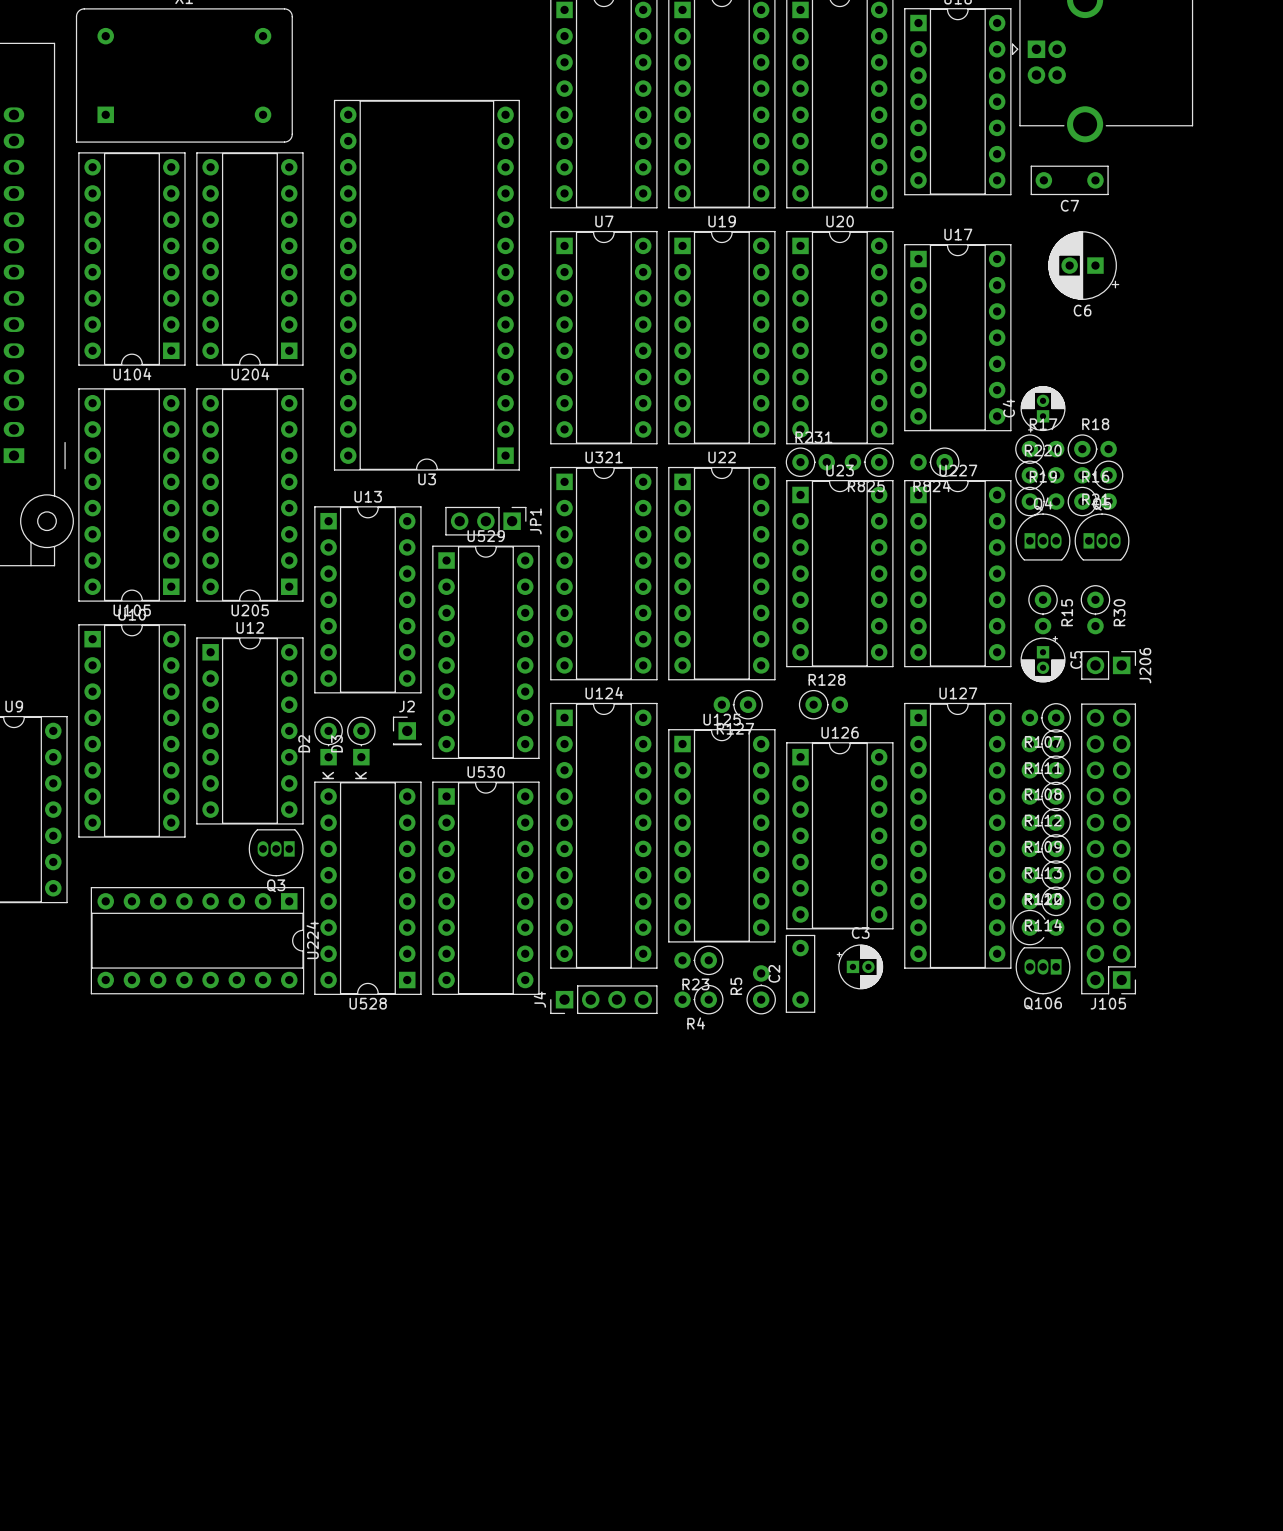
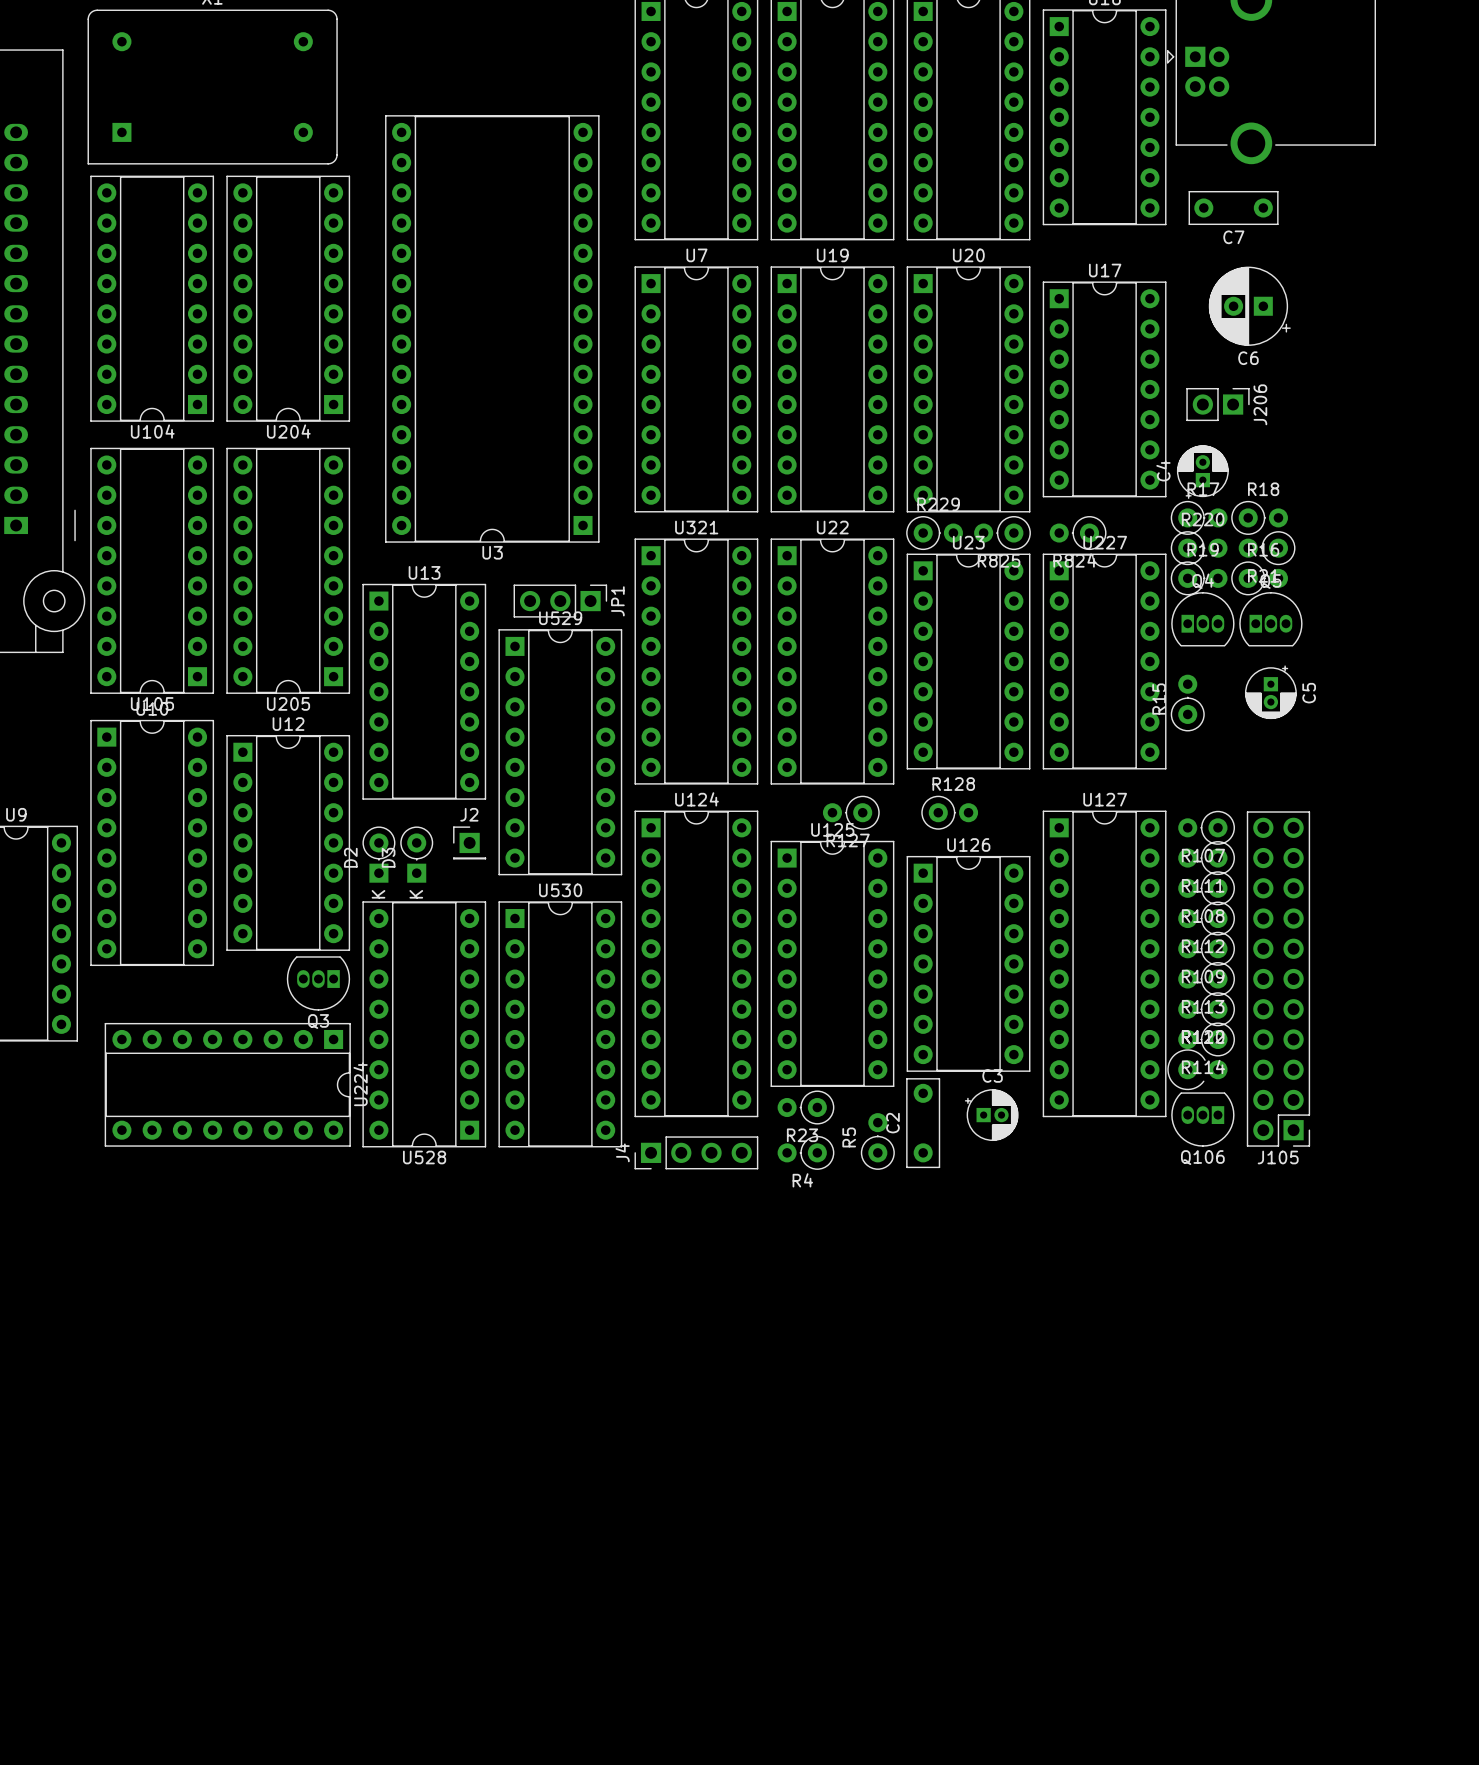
R231 name: R231 (813, 437) -> R229 (938, 504)
R15 rotation: 0° (1043, 609) -> 180° (1187, 703)
R30: (1095, 609) -> none
C5 position: (1043, 659) -> (1270, 692)
J206 position: (1108, 665) -> (1217, 404)

